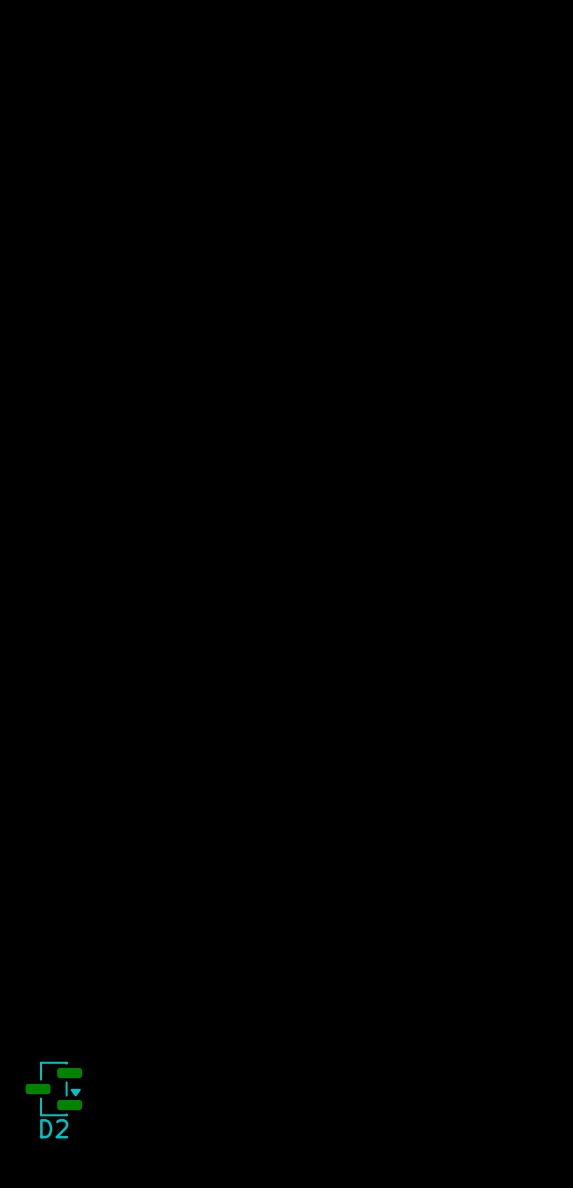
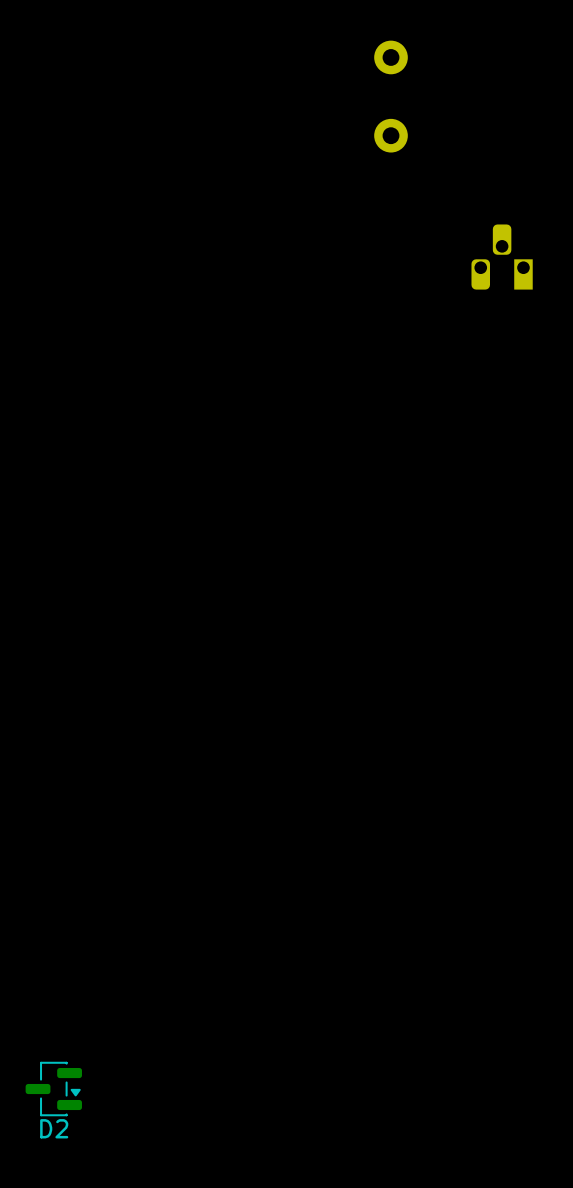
part: none -> (391, 57)
part: none -> (391, 135)
part: none -> (502, 257)

